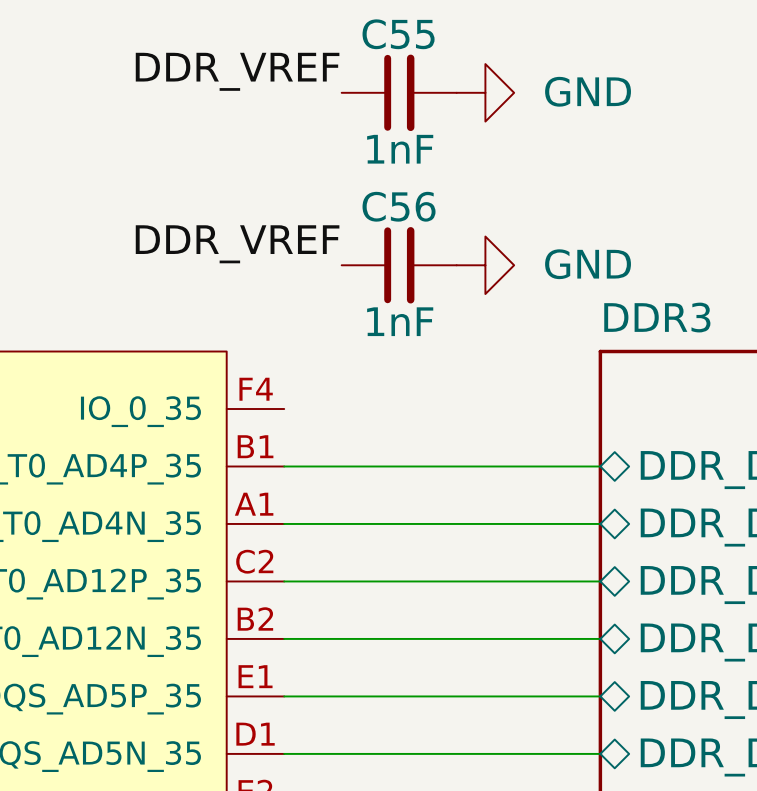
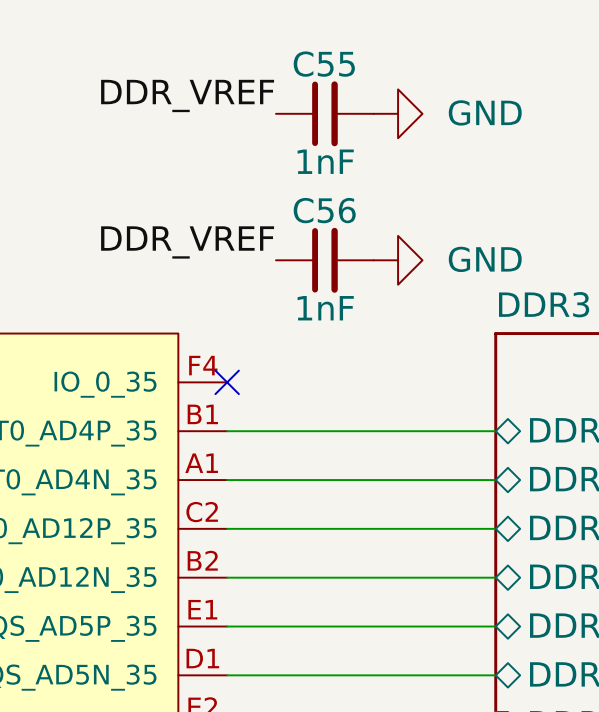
no-connect mark: none -> (227, 382)

